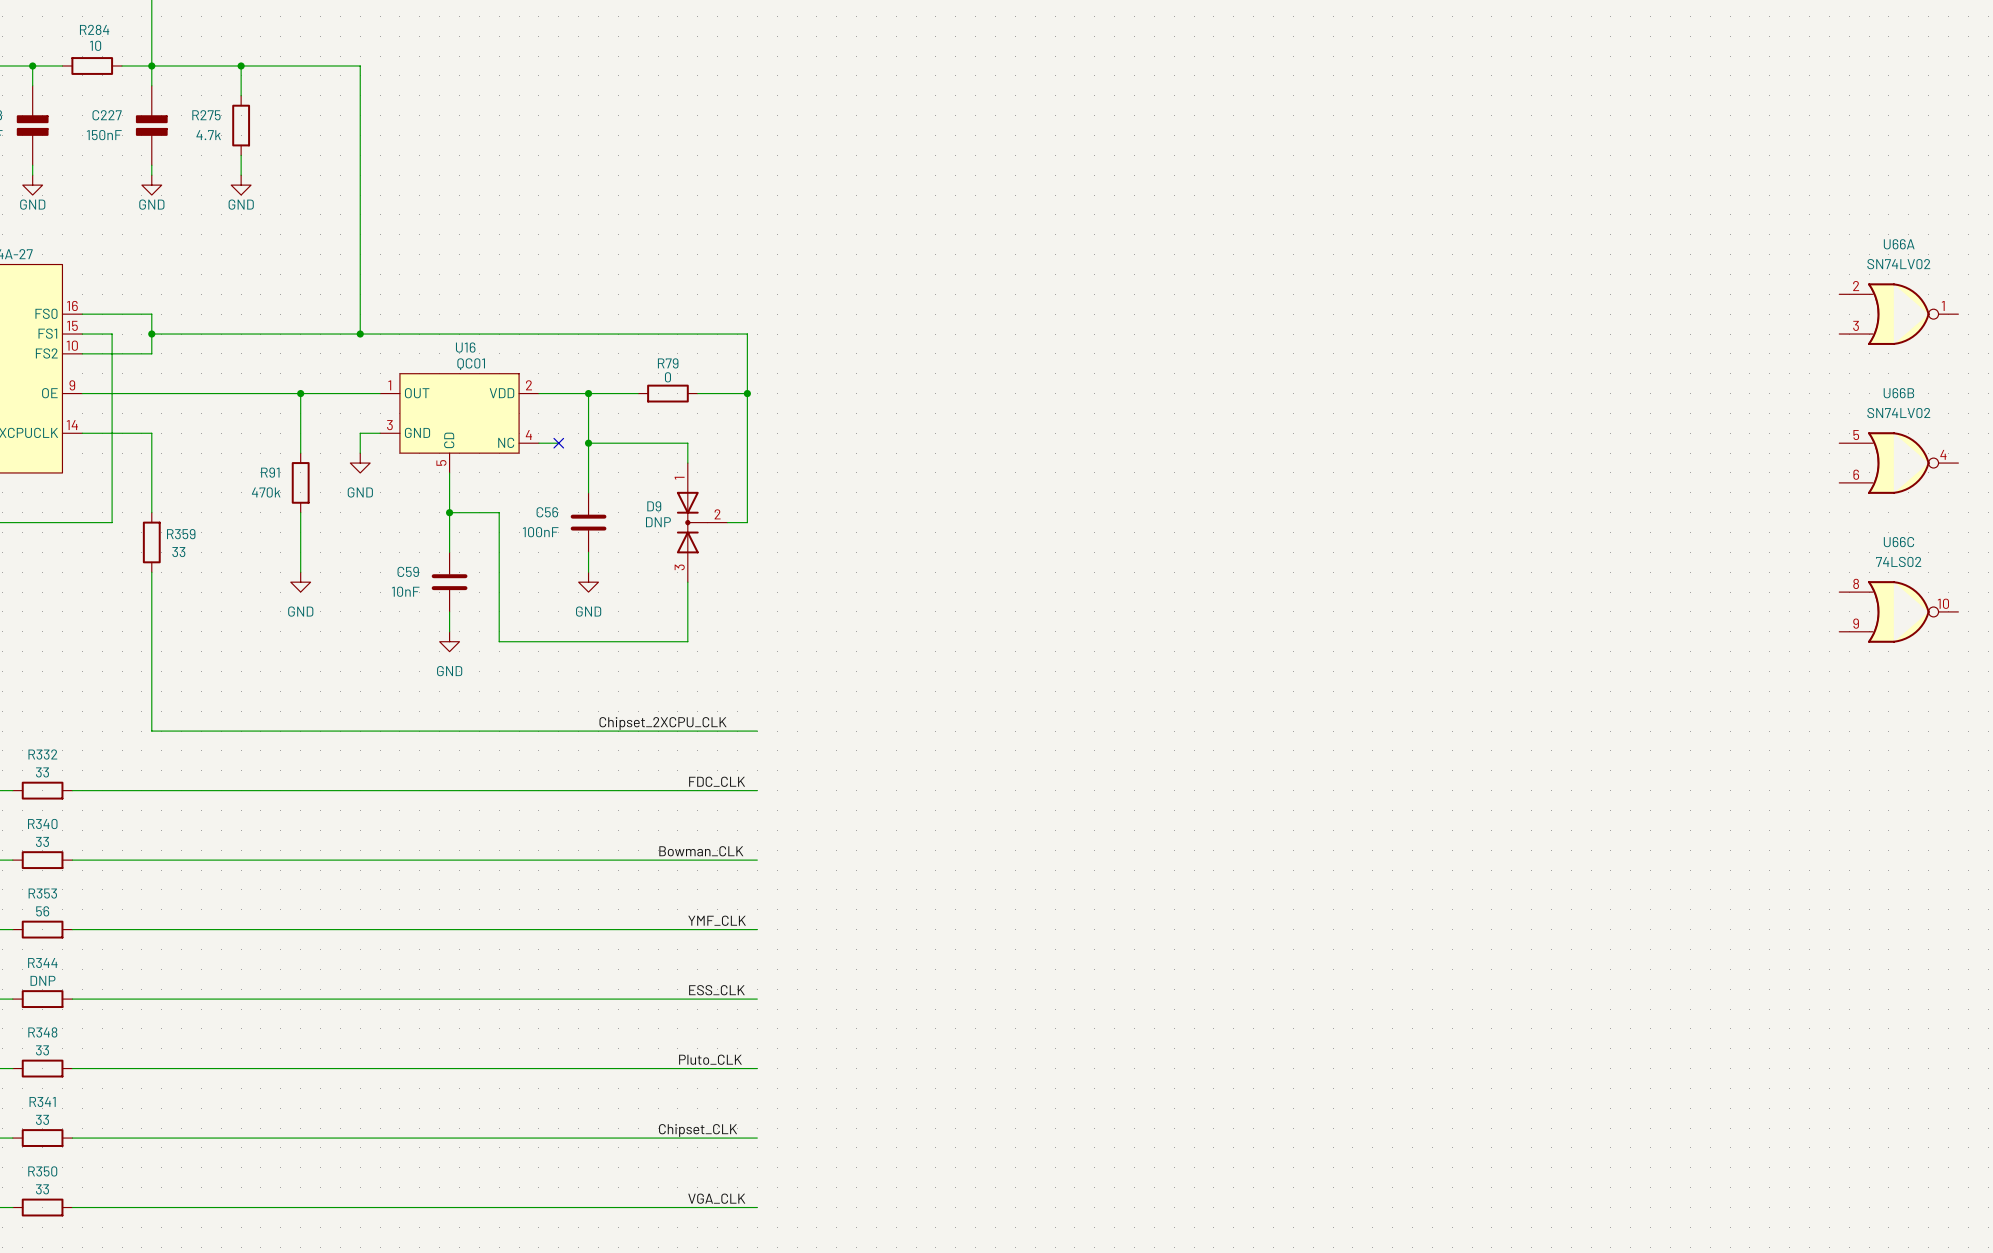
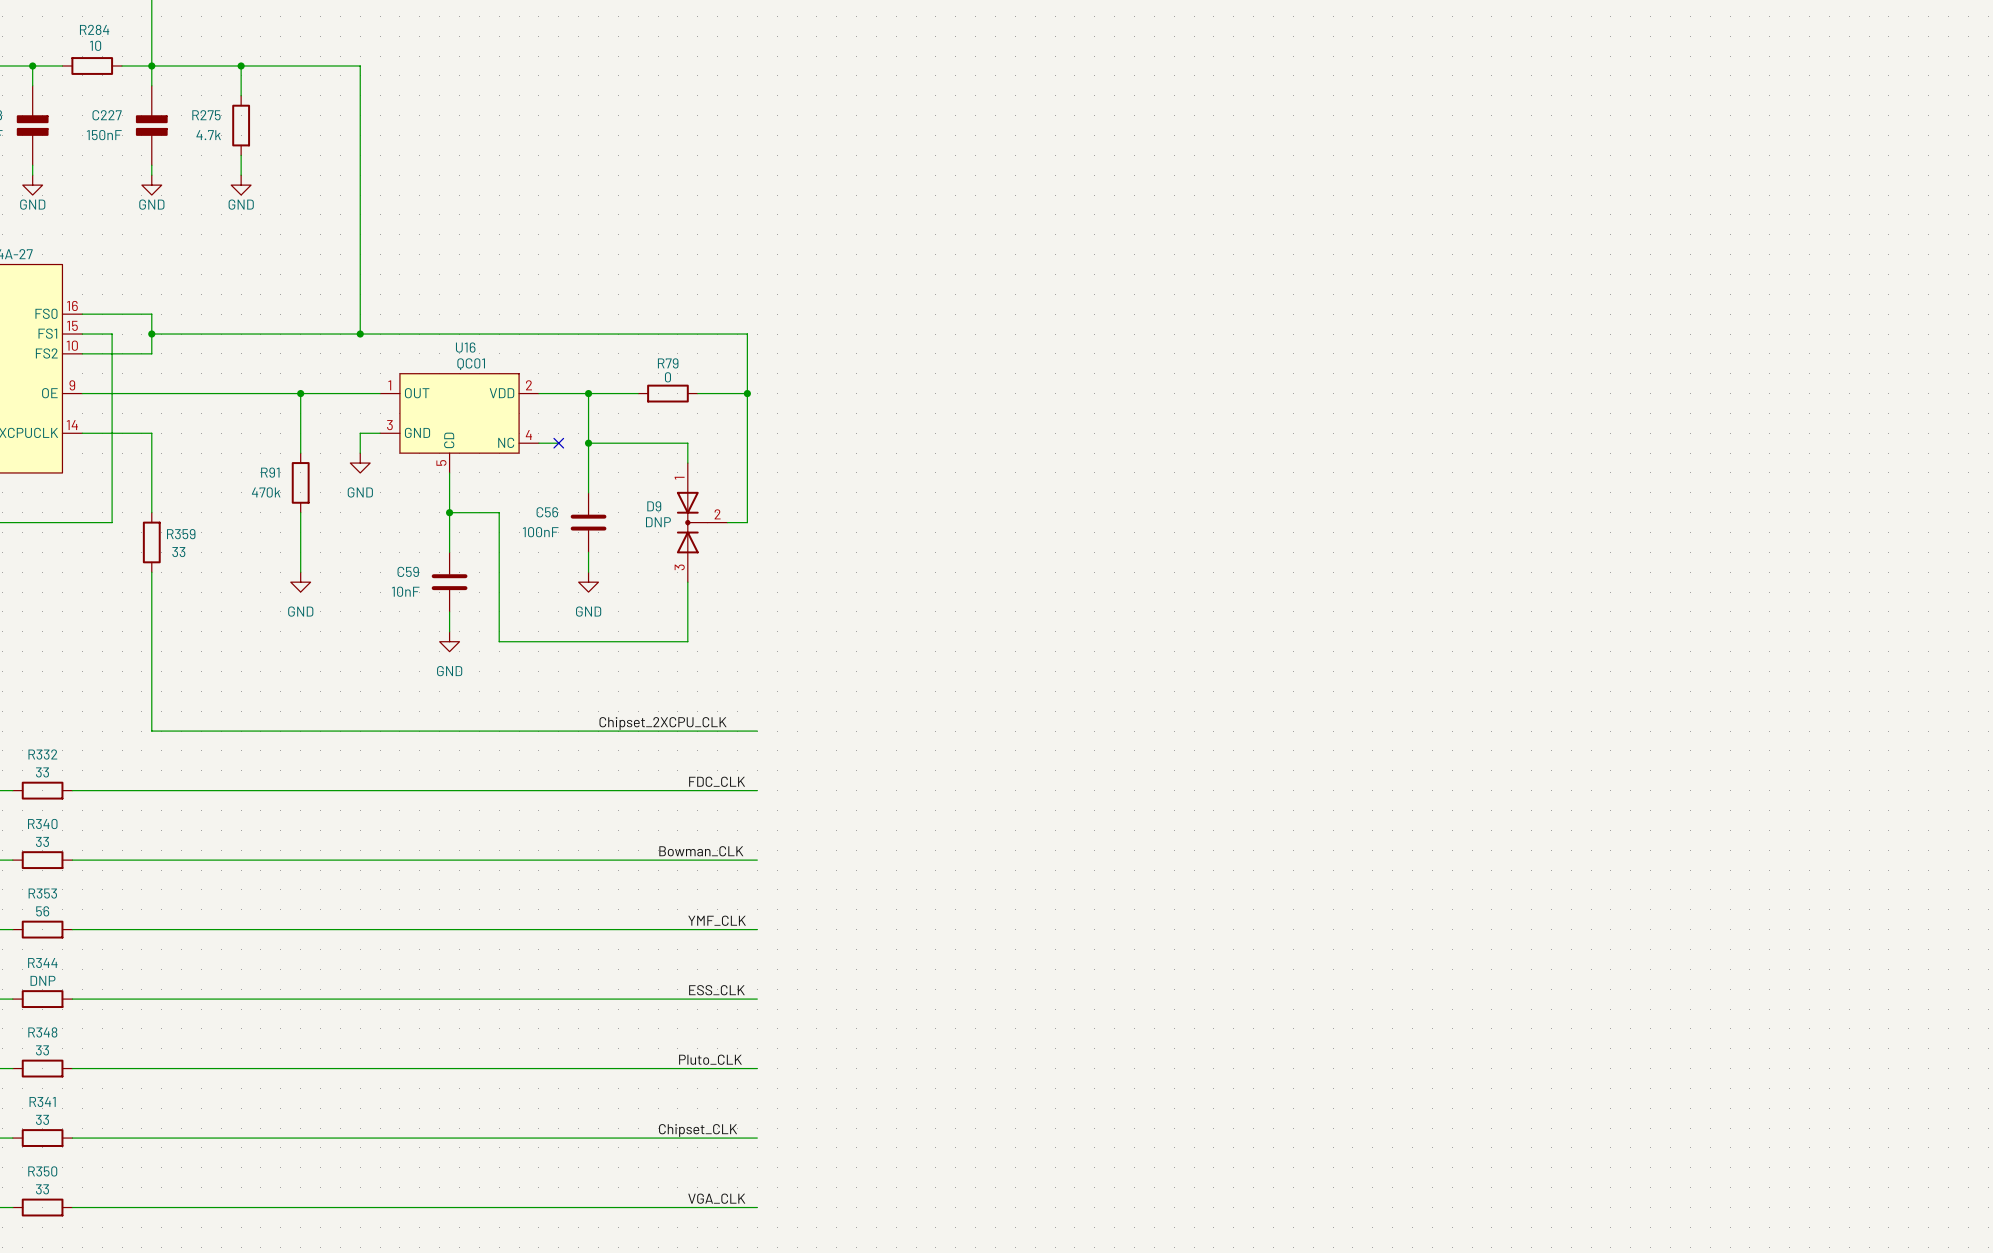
U66A: SN74LV02 (1898, 314) -> none
U66B: SN74LV02 (1898, 463) -> none
U66C: 74LS02 (1898, 611) -> none

